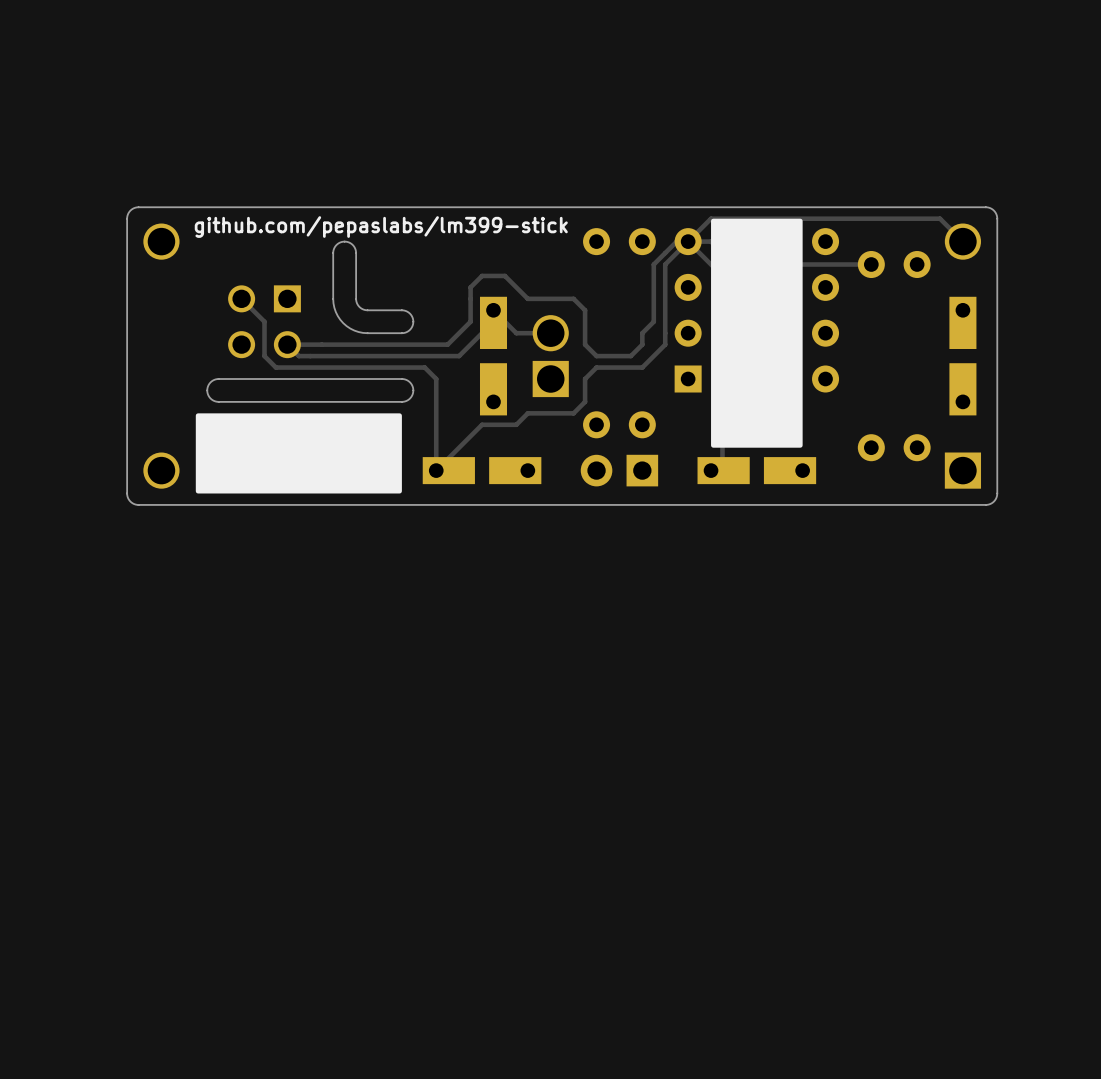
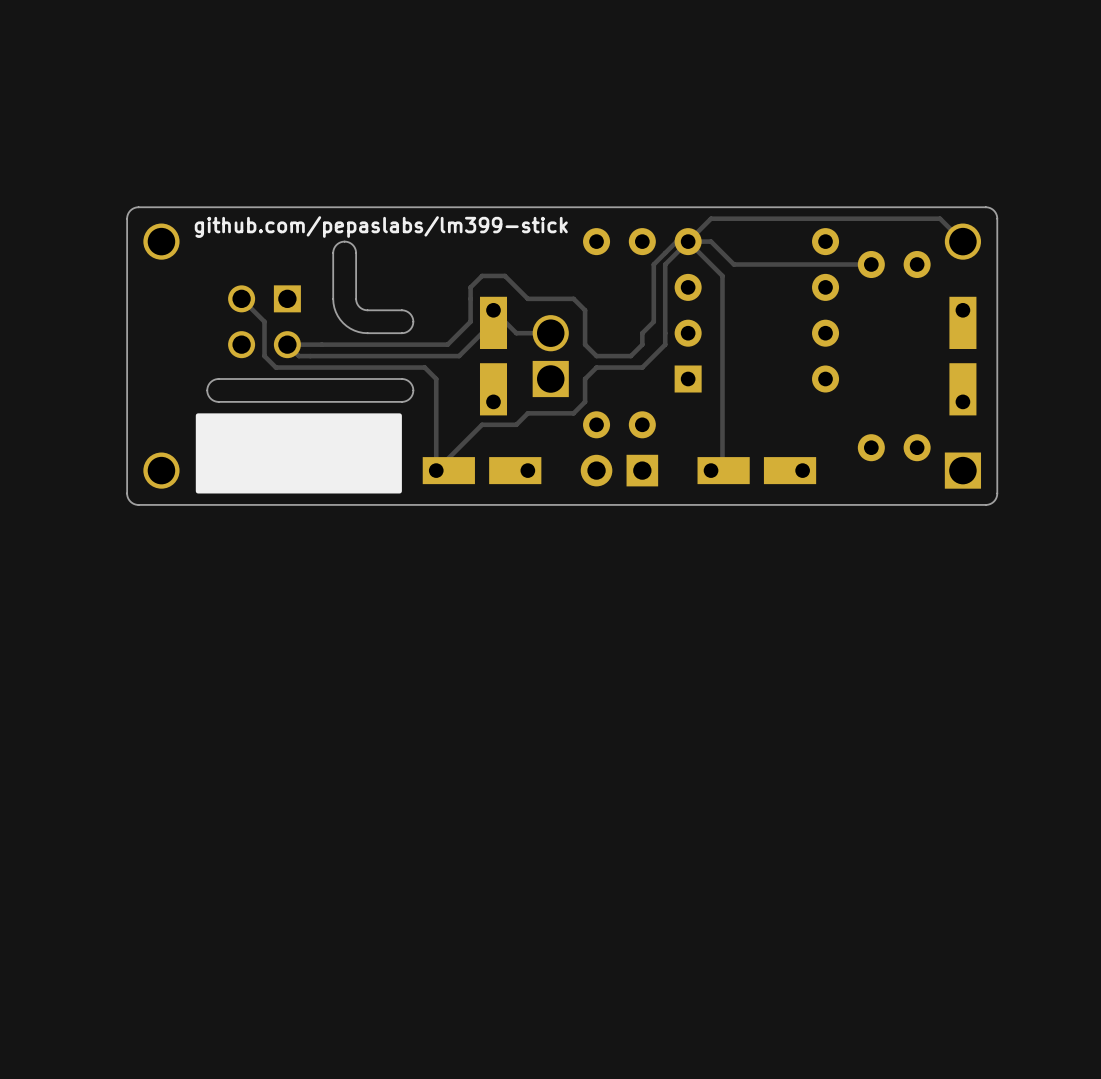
drawing: [711, 218, 803, 448] -> none

